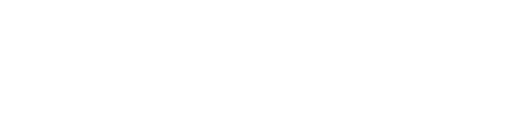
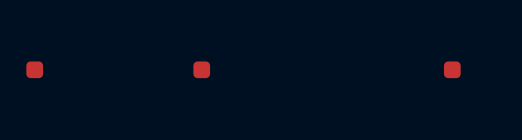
part: none -> (34, 69)
part: none -> (201, 69)
part: none -> (452, 69)

